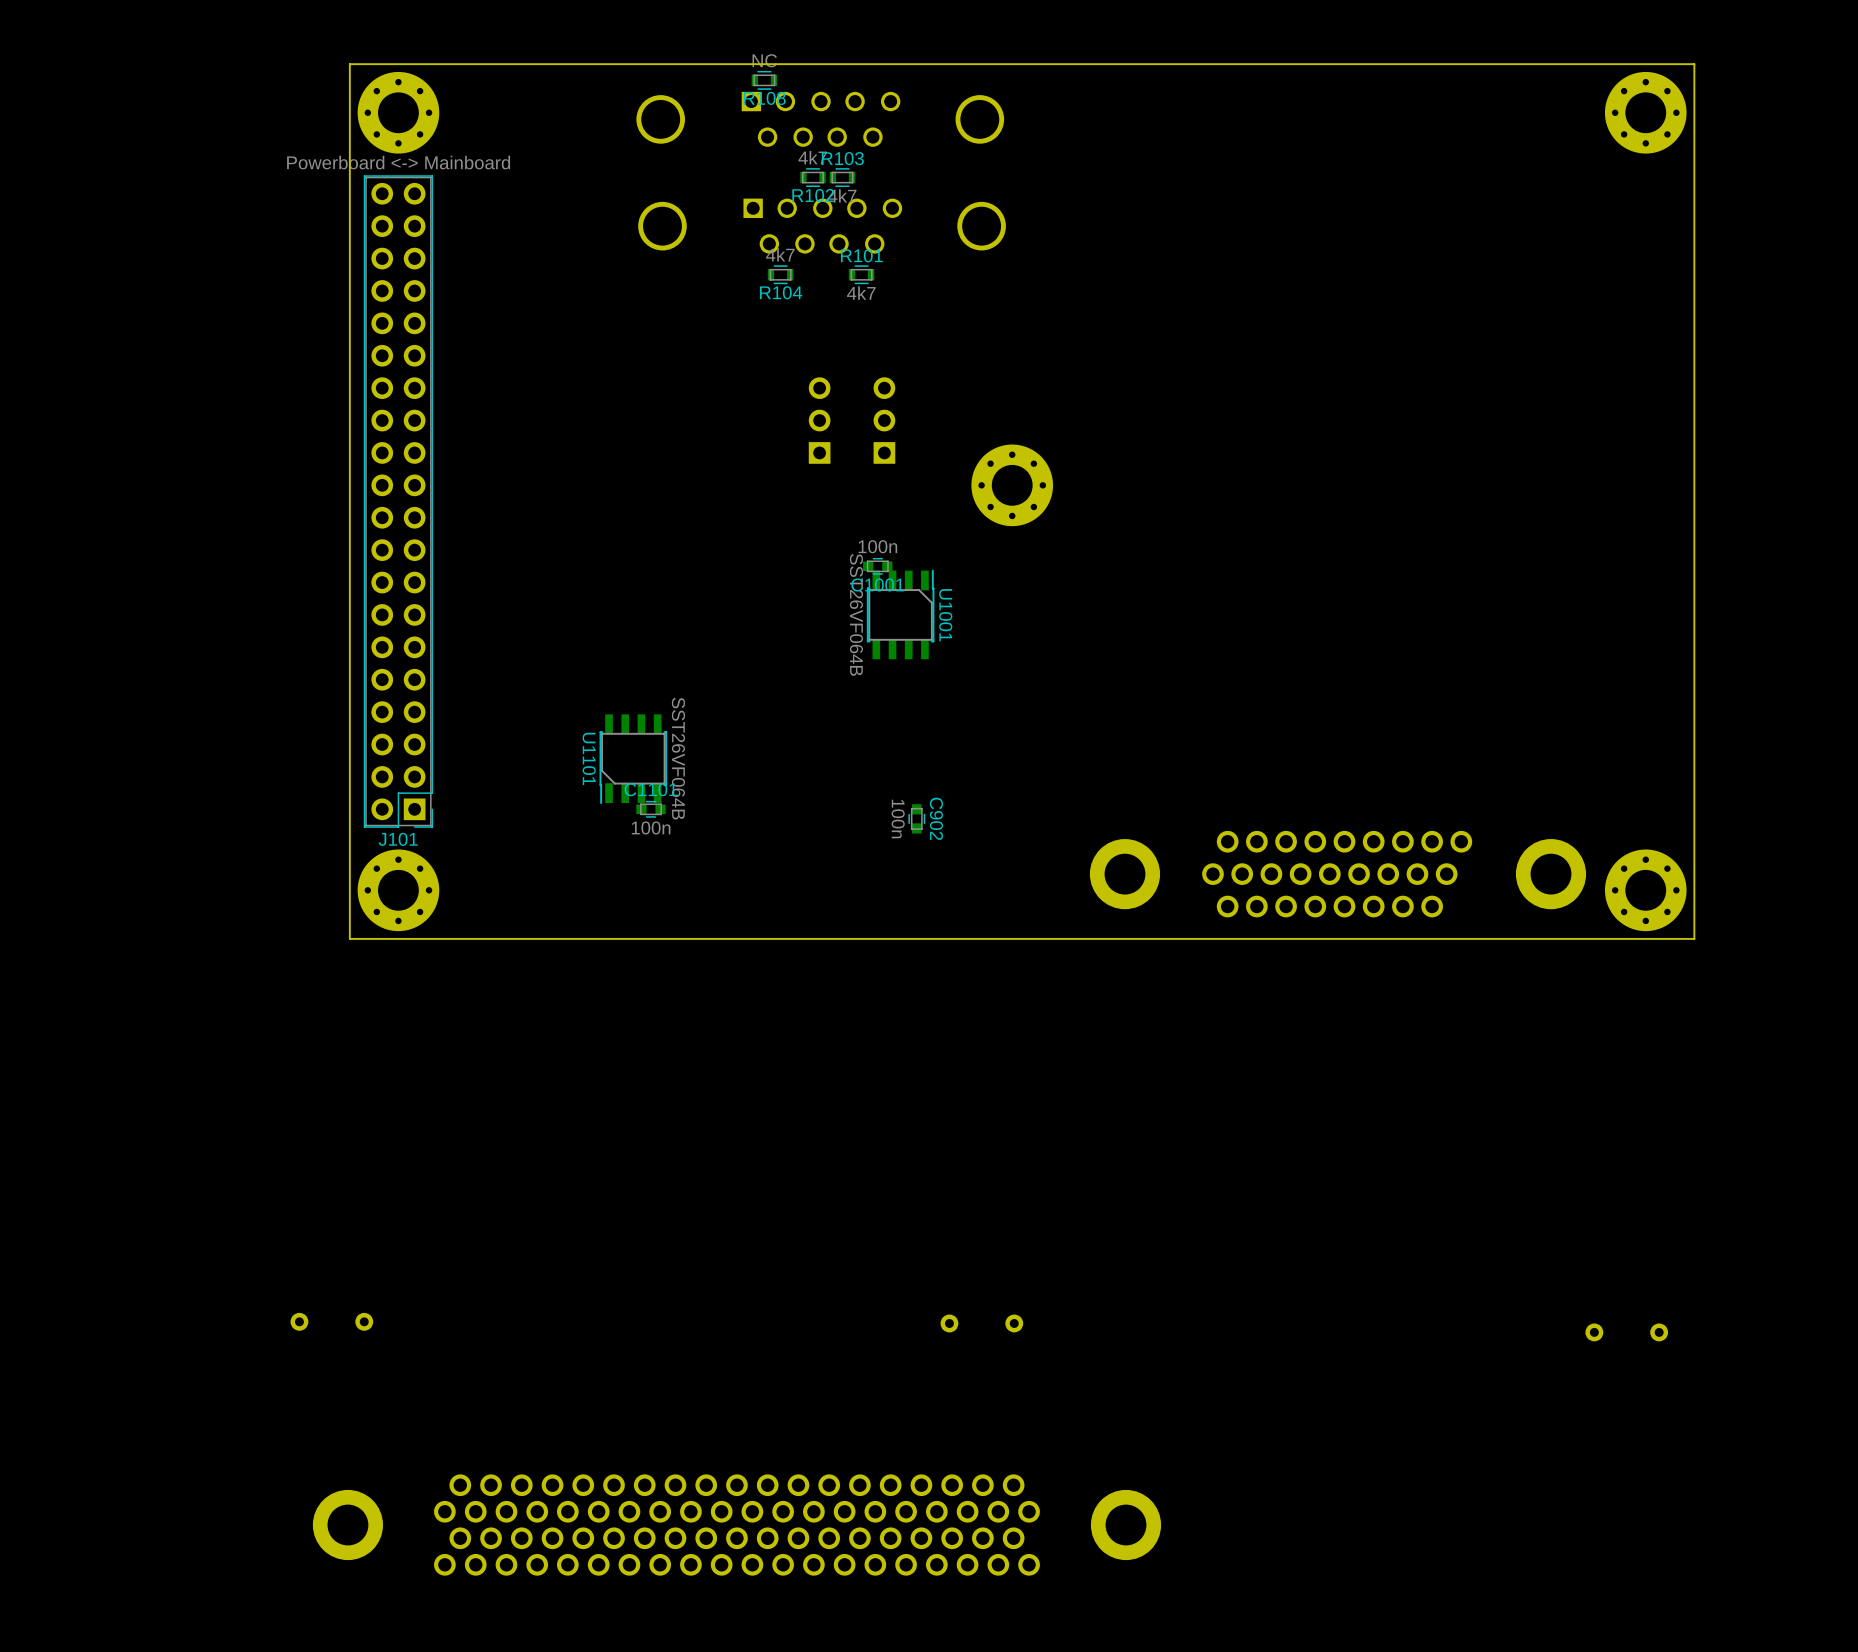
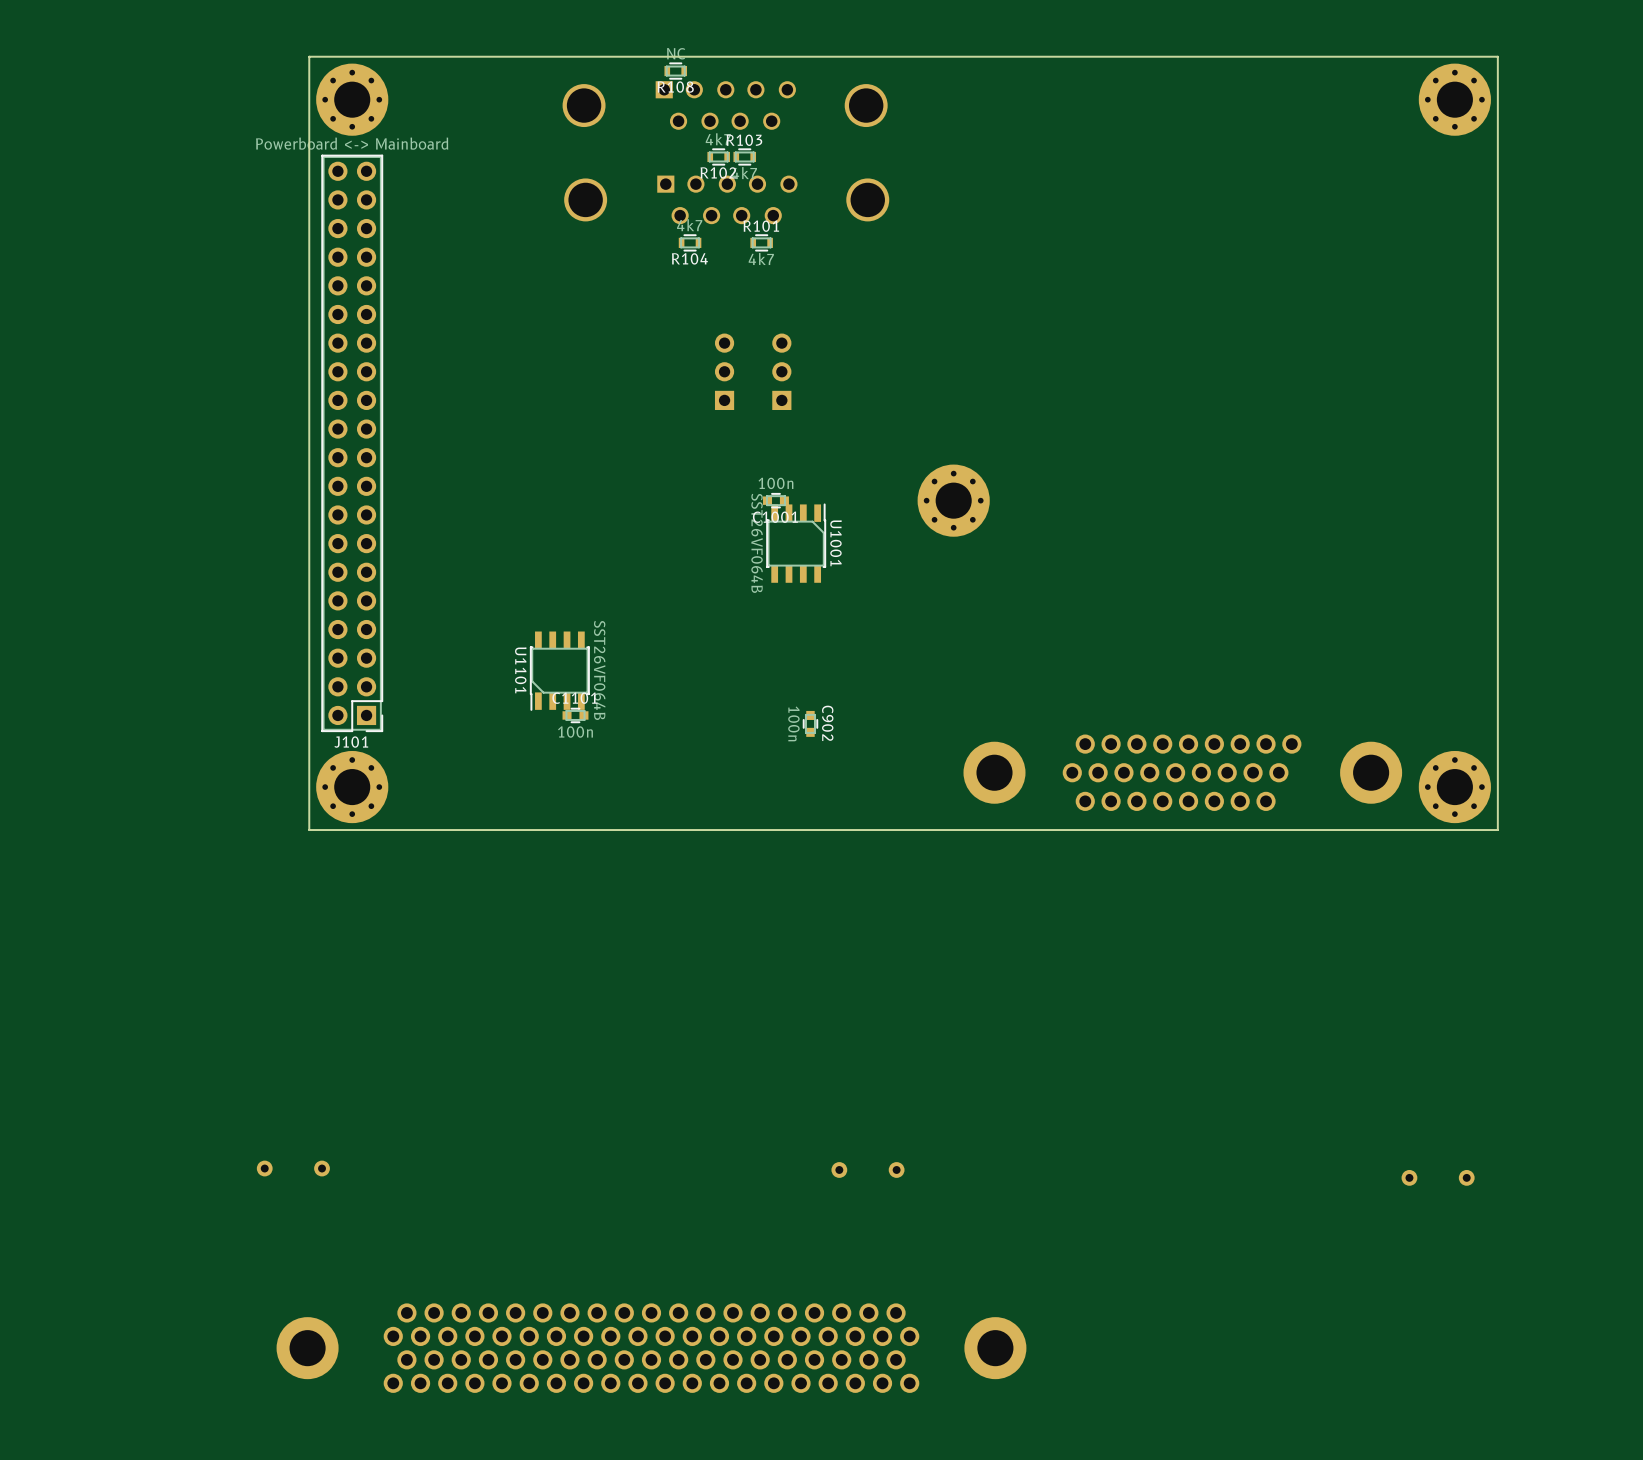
part position: (1012, 485) -> (953, 500)

